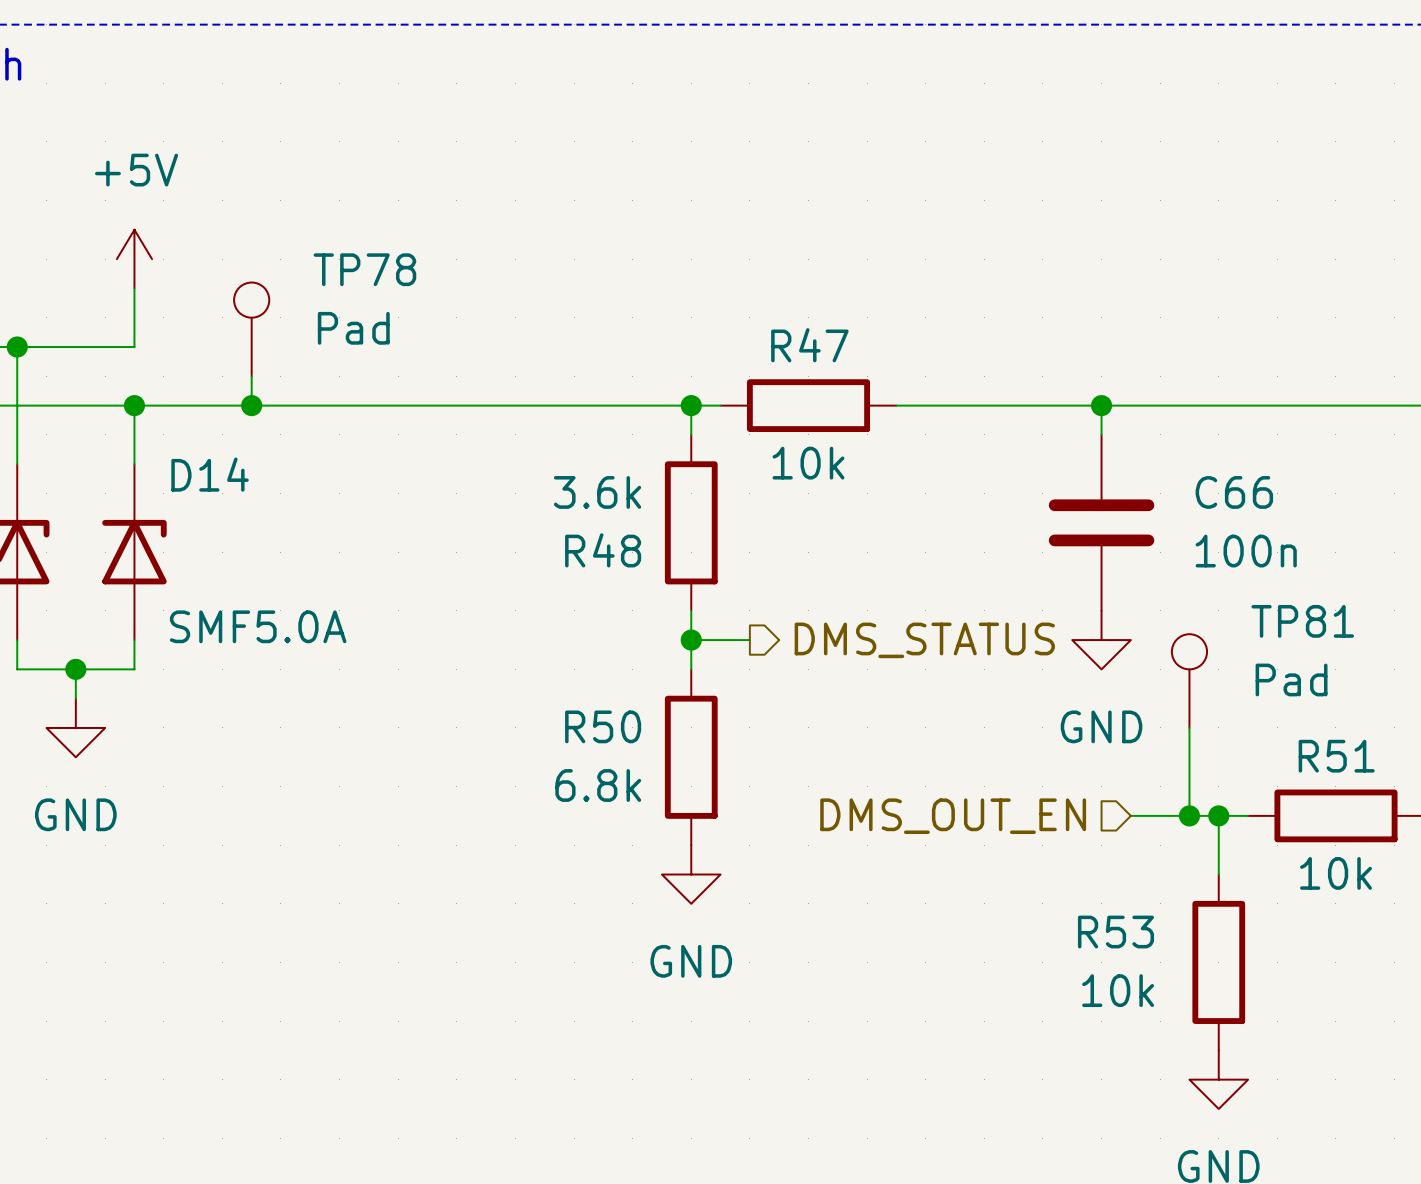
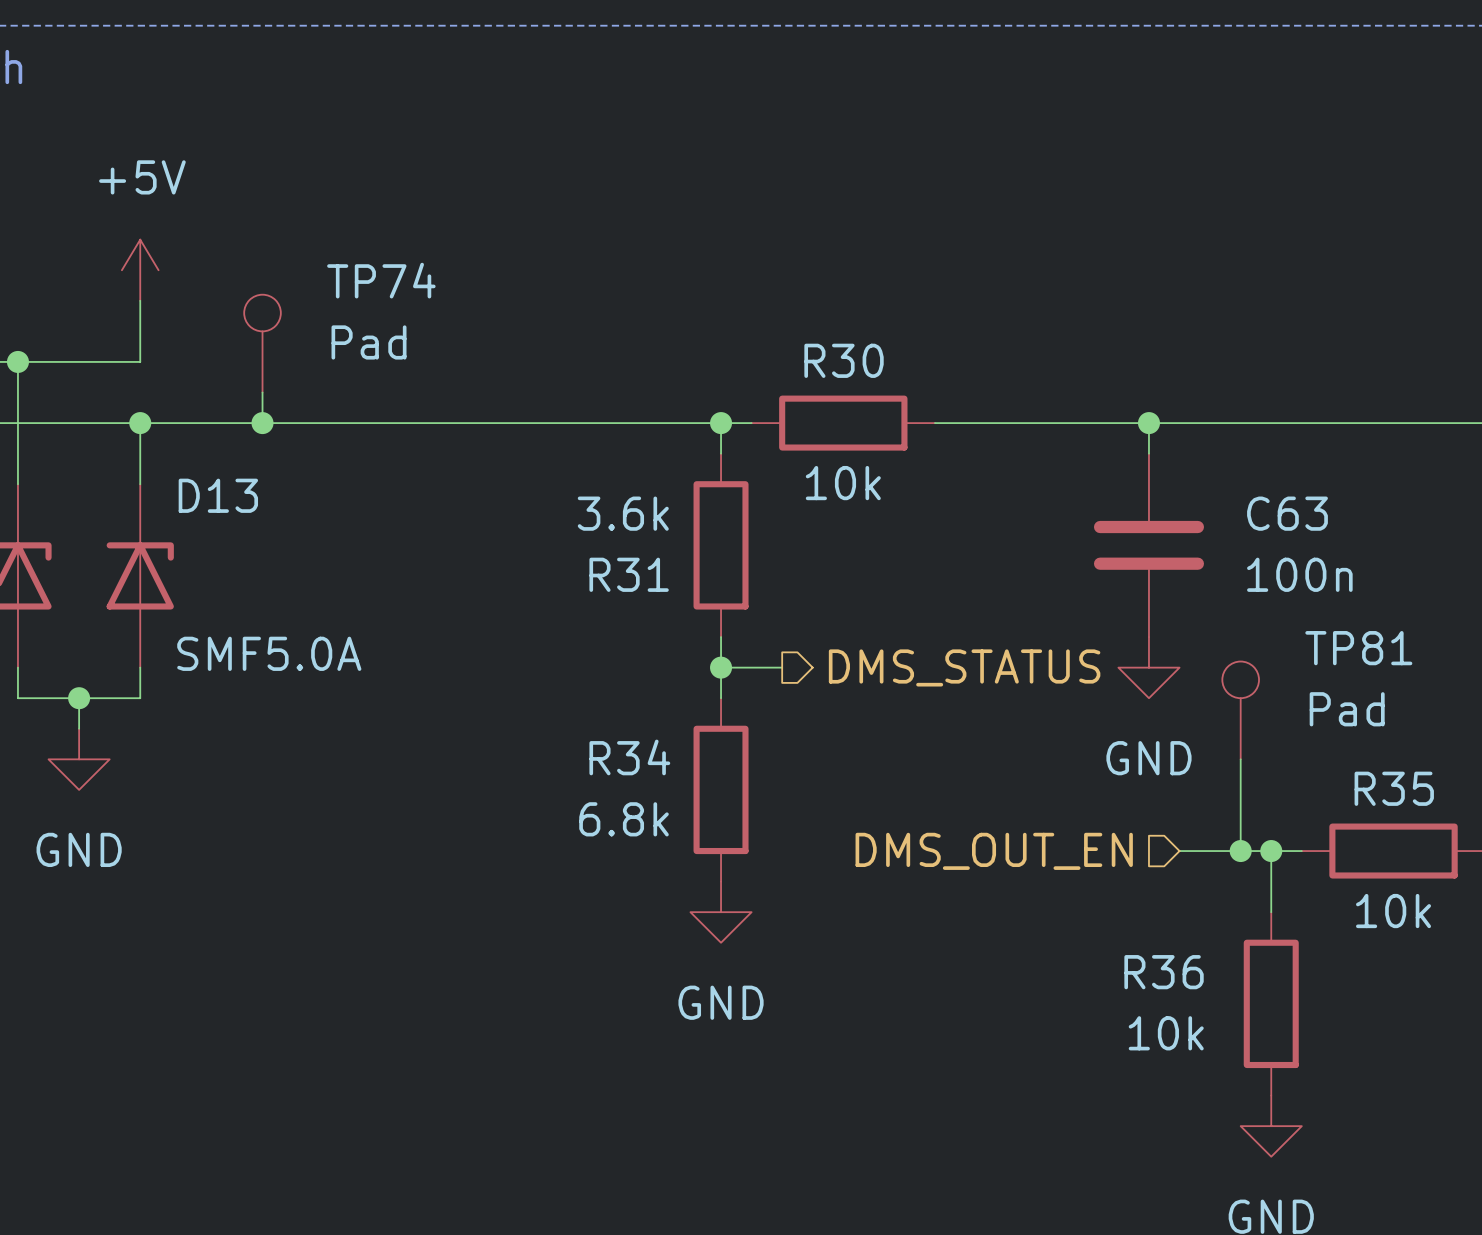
TP78 name: TP78 (364, 269) -> TP74 (381, 280)
R47 name: R47 (809, 345) -> R30 (844, 360)
D14 name: D14 (210, 474) -> D13 (218, 495)
C66 name: C66 (1234, 492) -> C63 (1287, 513)
R48 name: R48 (603, 550) -> R31 (629, 574)
R50 name: R50 (603, 726) -> R34 (629, 757)
R51 name: R51 (1336, 756) -> R35 (1394, 788)
R53 name: R53 (1115, 932) -> R36 (1164, 972)

